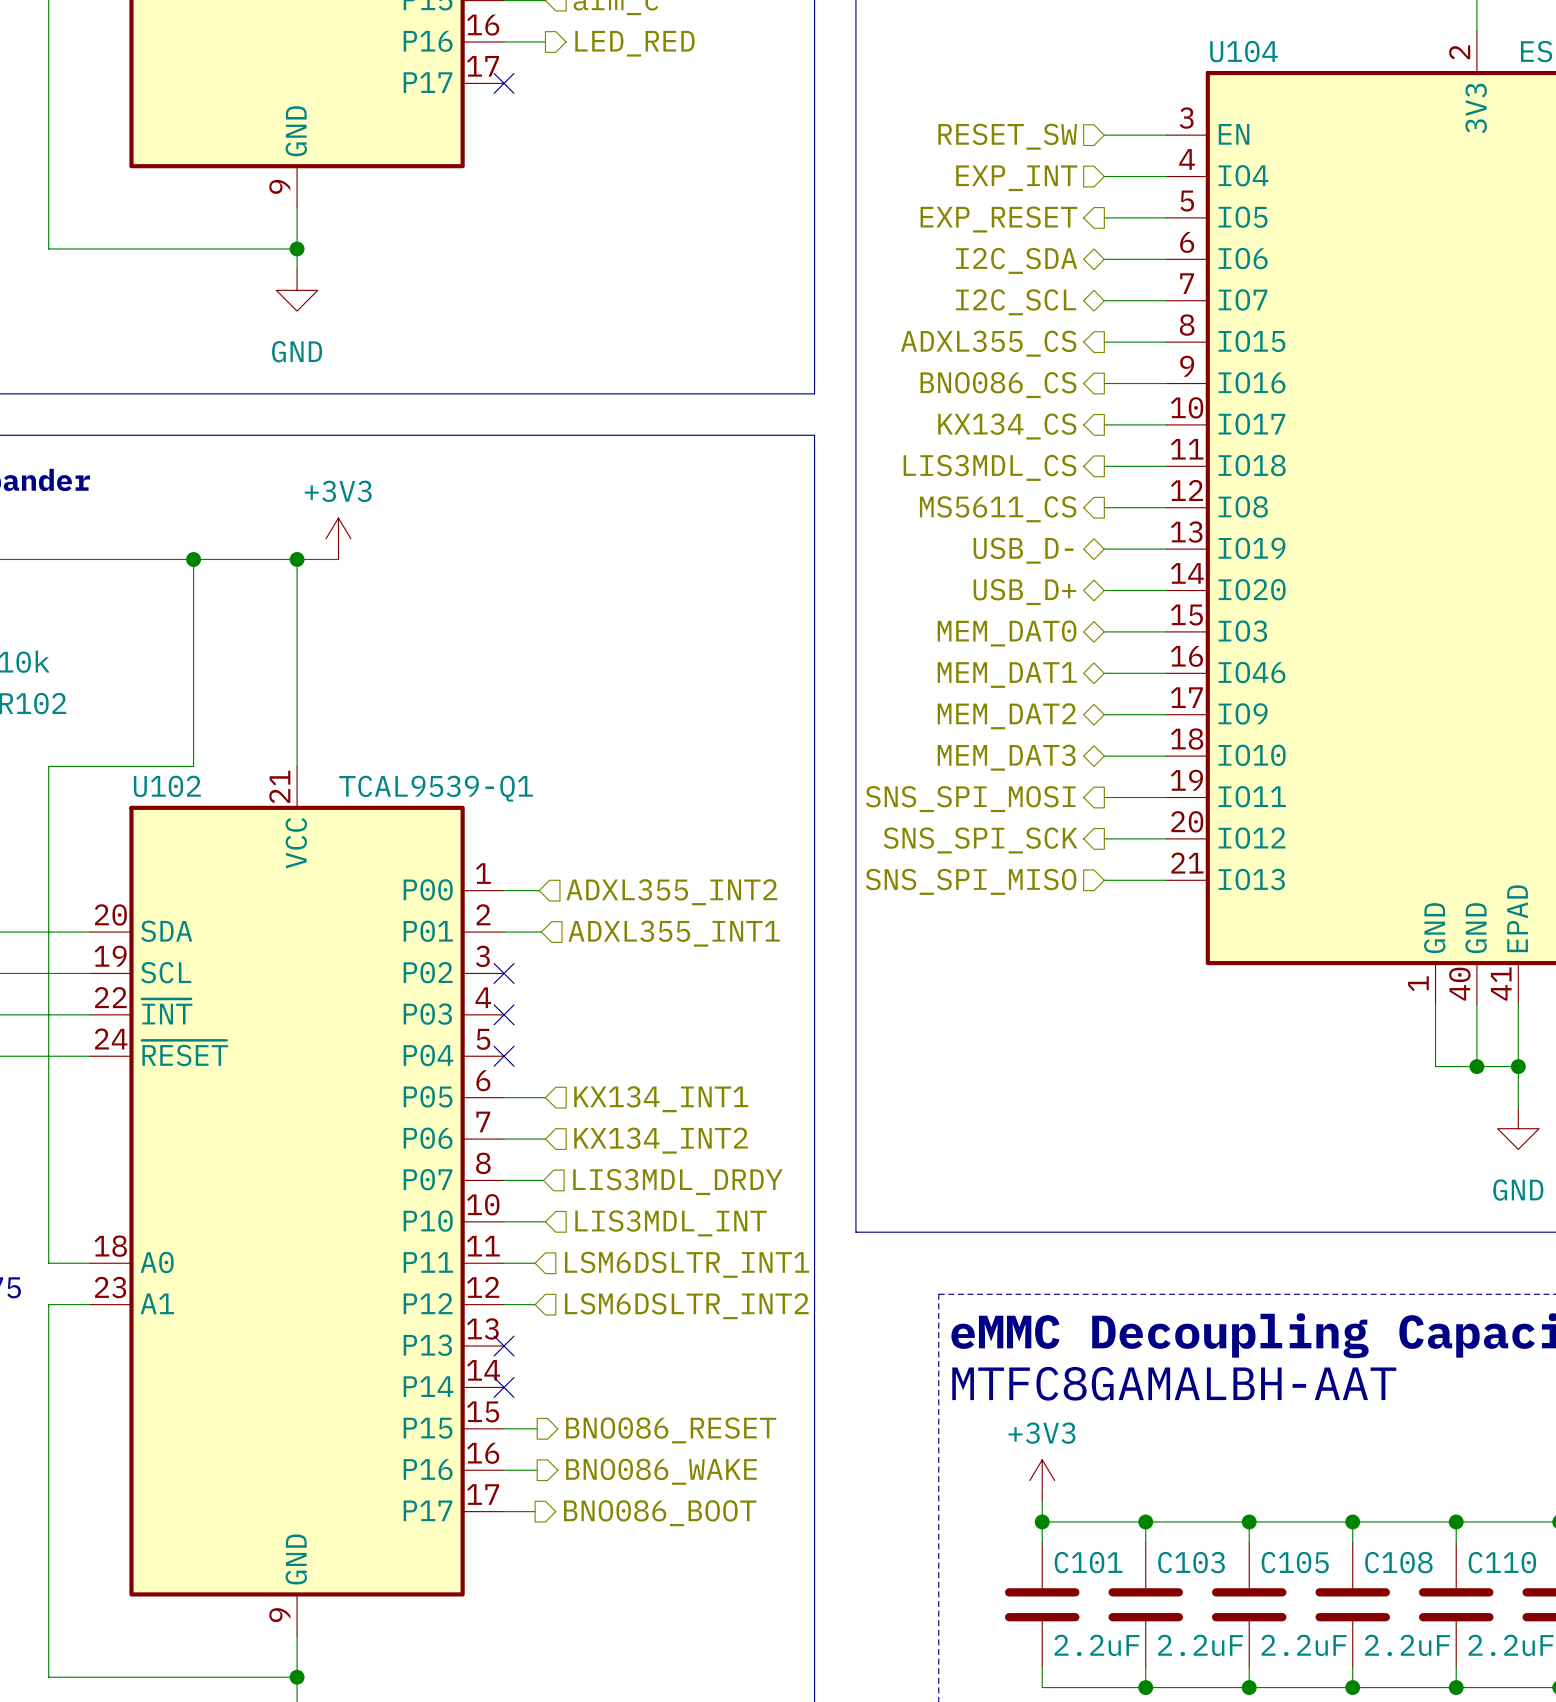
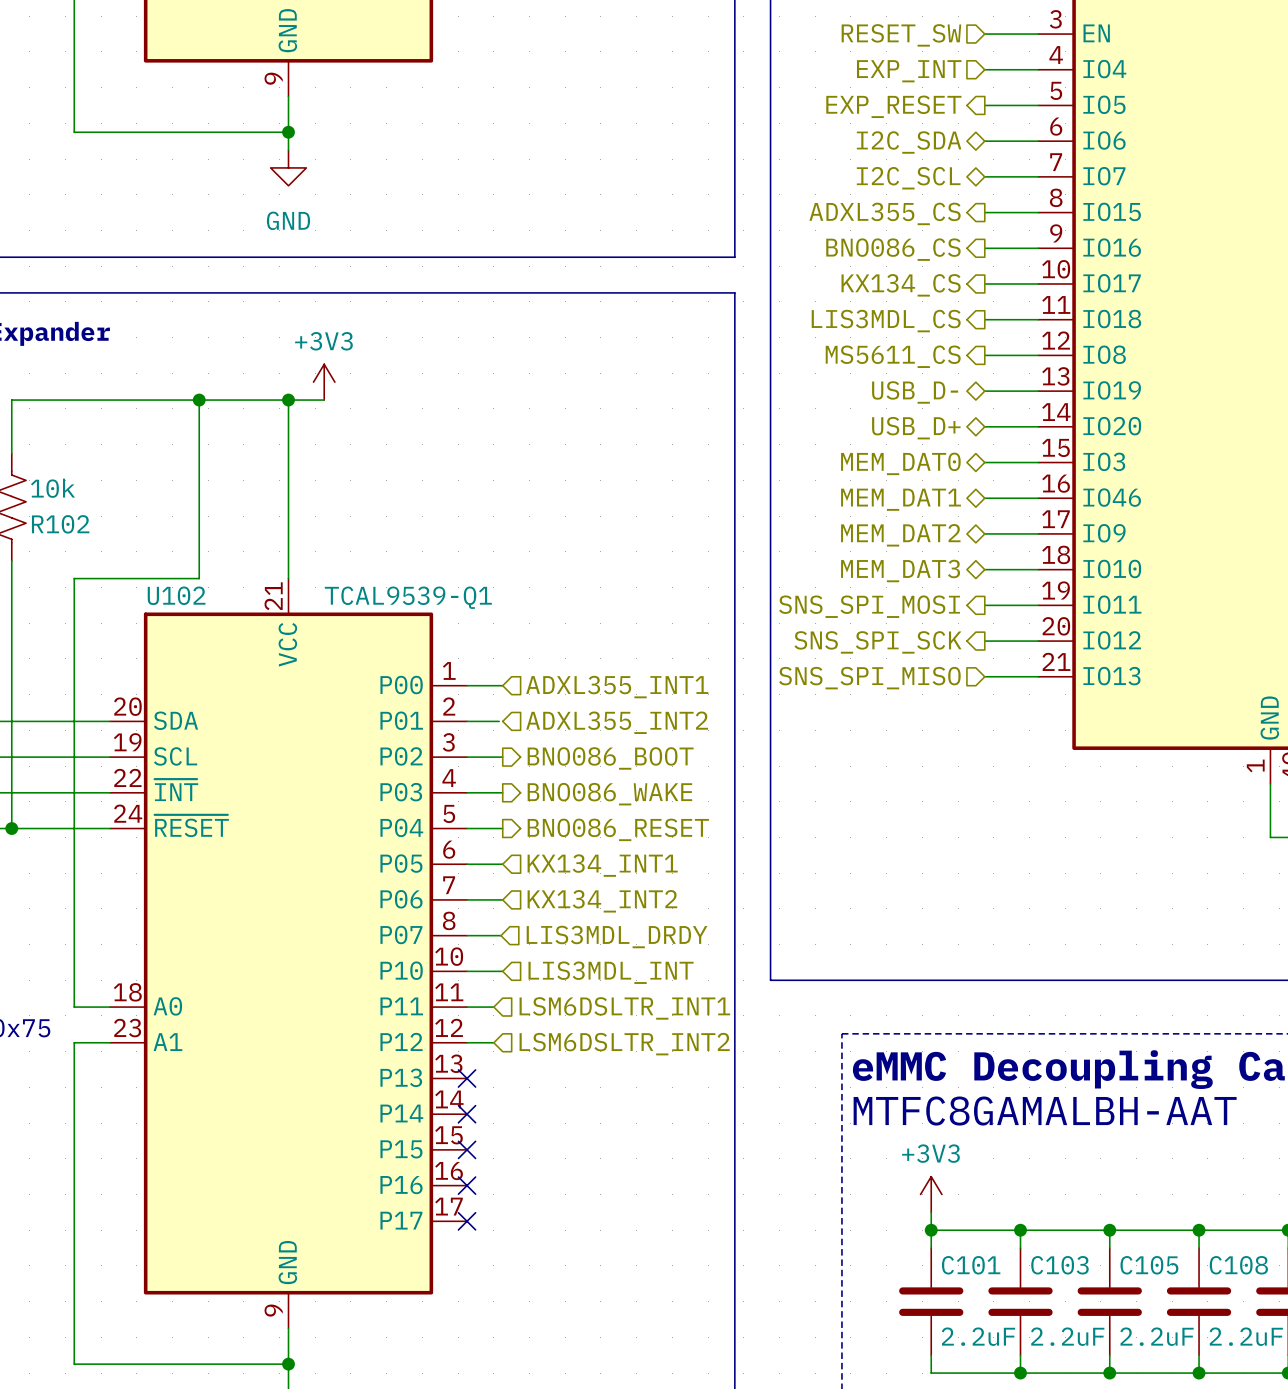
wire: none -> (497, 685) (502, 685)
hierarchical label position: ADXL355_INT2 (671, 892) -> ADXL355_INT2 (617, 722)
hierarchical label position: ADXL355_INT1 (674, 933) -> ADXL355_INT1 (617, 687)
wire: none -> (467, 757) (502, 757)
no-connect mark: (504, 973) -> none
hierarchical label: none -> BNO086_BOOT (610, 758)
wire: none -> (467, 792) (502, 792)
no-connect mark: (504, 1014) -> none
hierarchical label: none -> BNO086_WAKE (609, 794)
wire: none -> (467, 828) (502, 828)
no-connect mark: (504, 1056) -> none
wire: (504, 1428) (537, 1428) -> none
no-connect mark: none -> (467, 1149)
hierarchical label position: BNO086_RESET (671, 1430) -> BNO086_RESET (618, 829)
wire: (504, 1470) (537, 1470) -> none
no-connect mark: none -> (467, 1185)
hierarchical label: BNO086_WAKE (661, 1471) -> none
wire: (504, 1511) (535, 1511) -> none
no-connect mark: none -> (467, 1221)
hierarchical label: BNO086_BOOT (660, 1513) -> none

